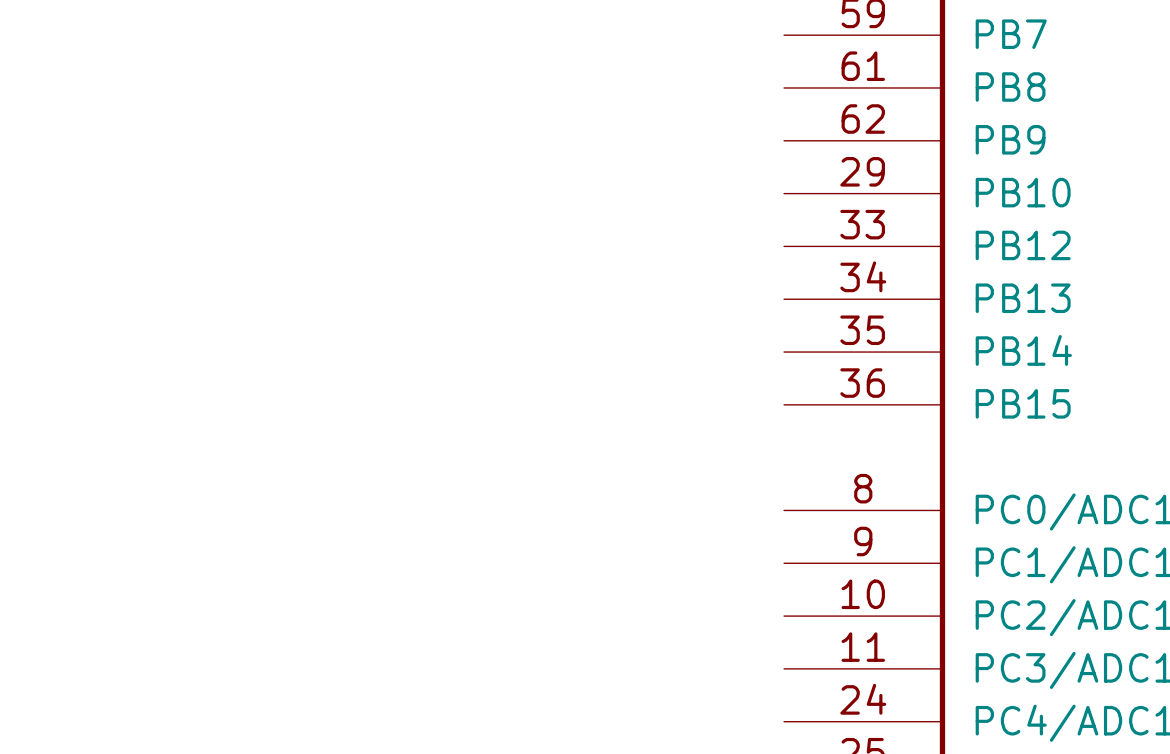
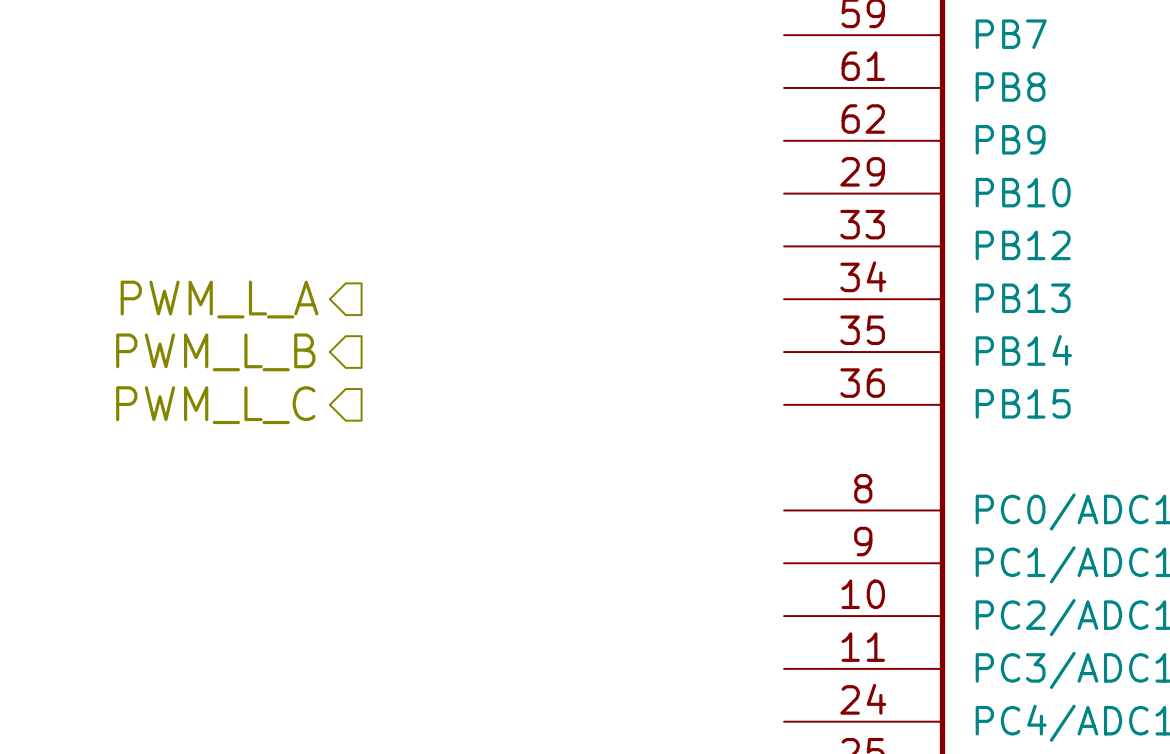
hierarchical label: none -> PWM_L_A (219, 299)
hierarchical label: none -> PWM_L_B (215, 352)
hierarchical label: none -> PWM_L_C (215, 405)

